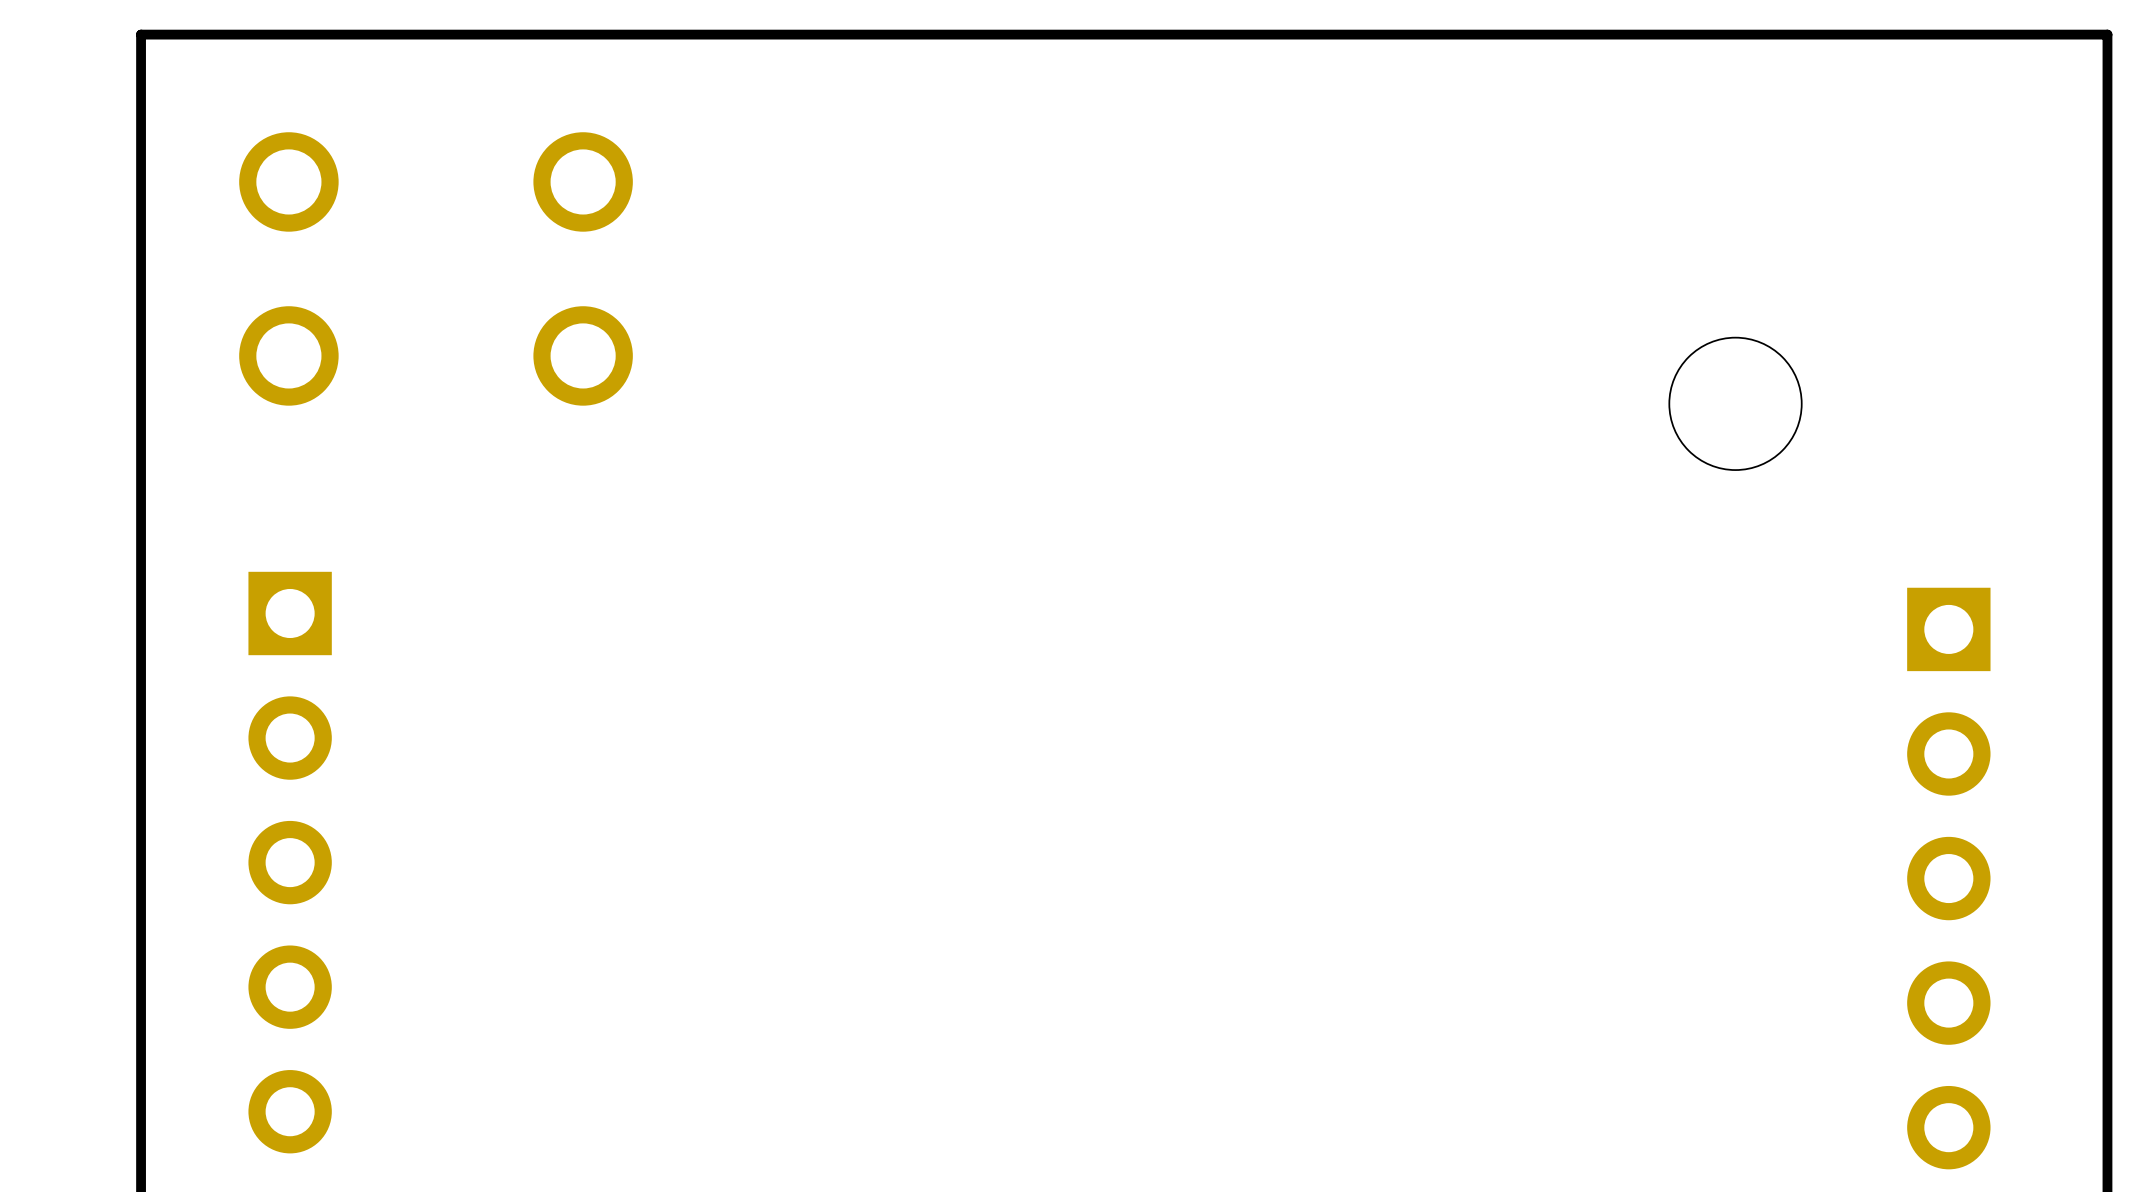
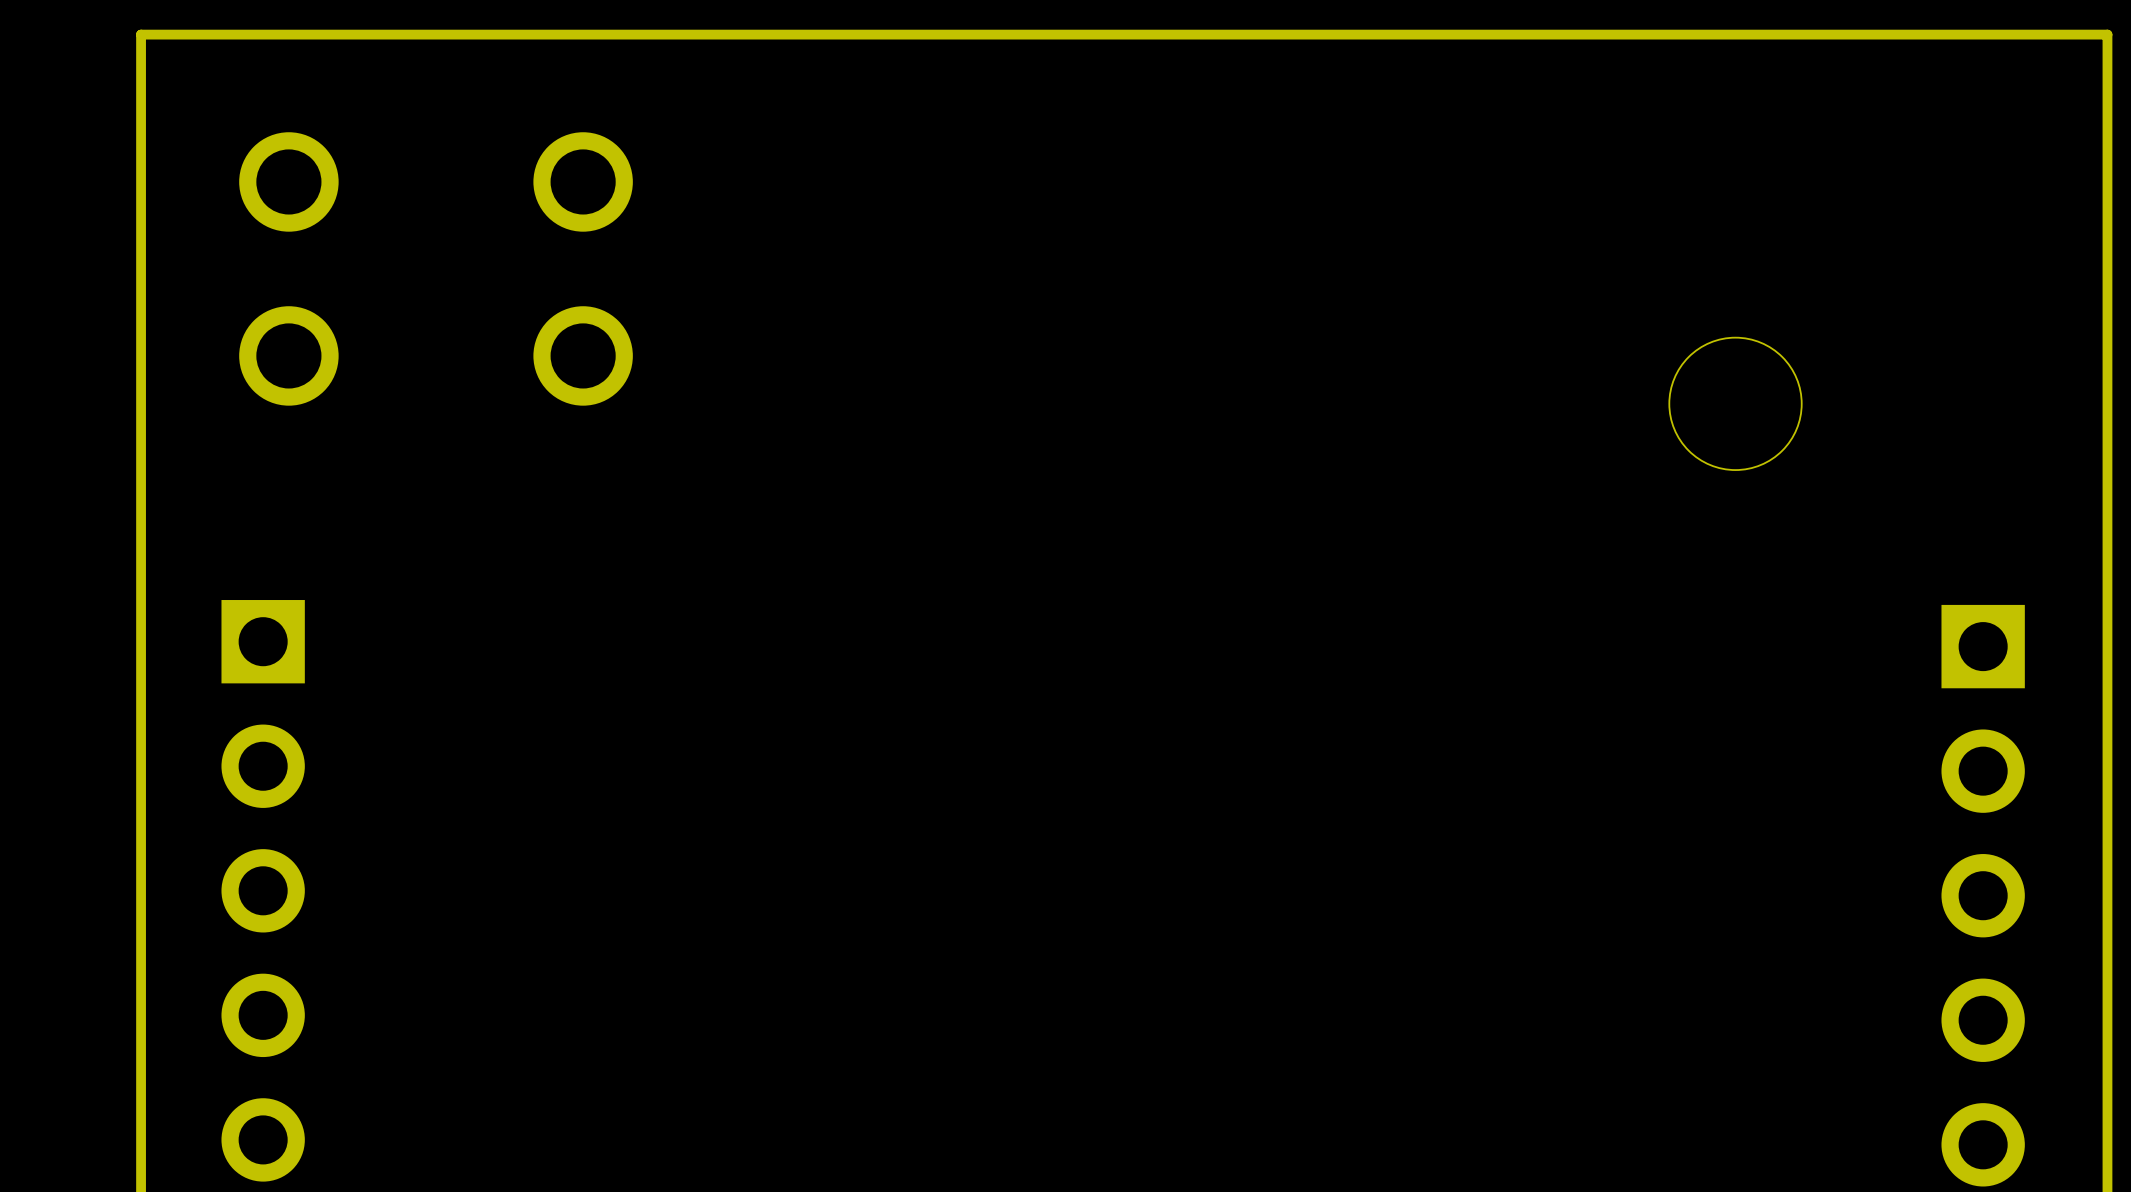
part position: (290, 862) -> (263, 890)
part position: (1948, 878) -> (1983, 895)

